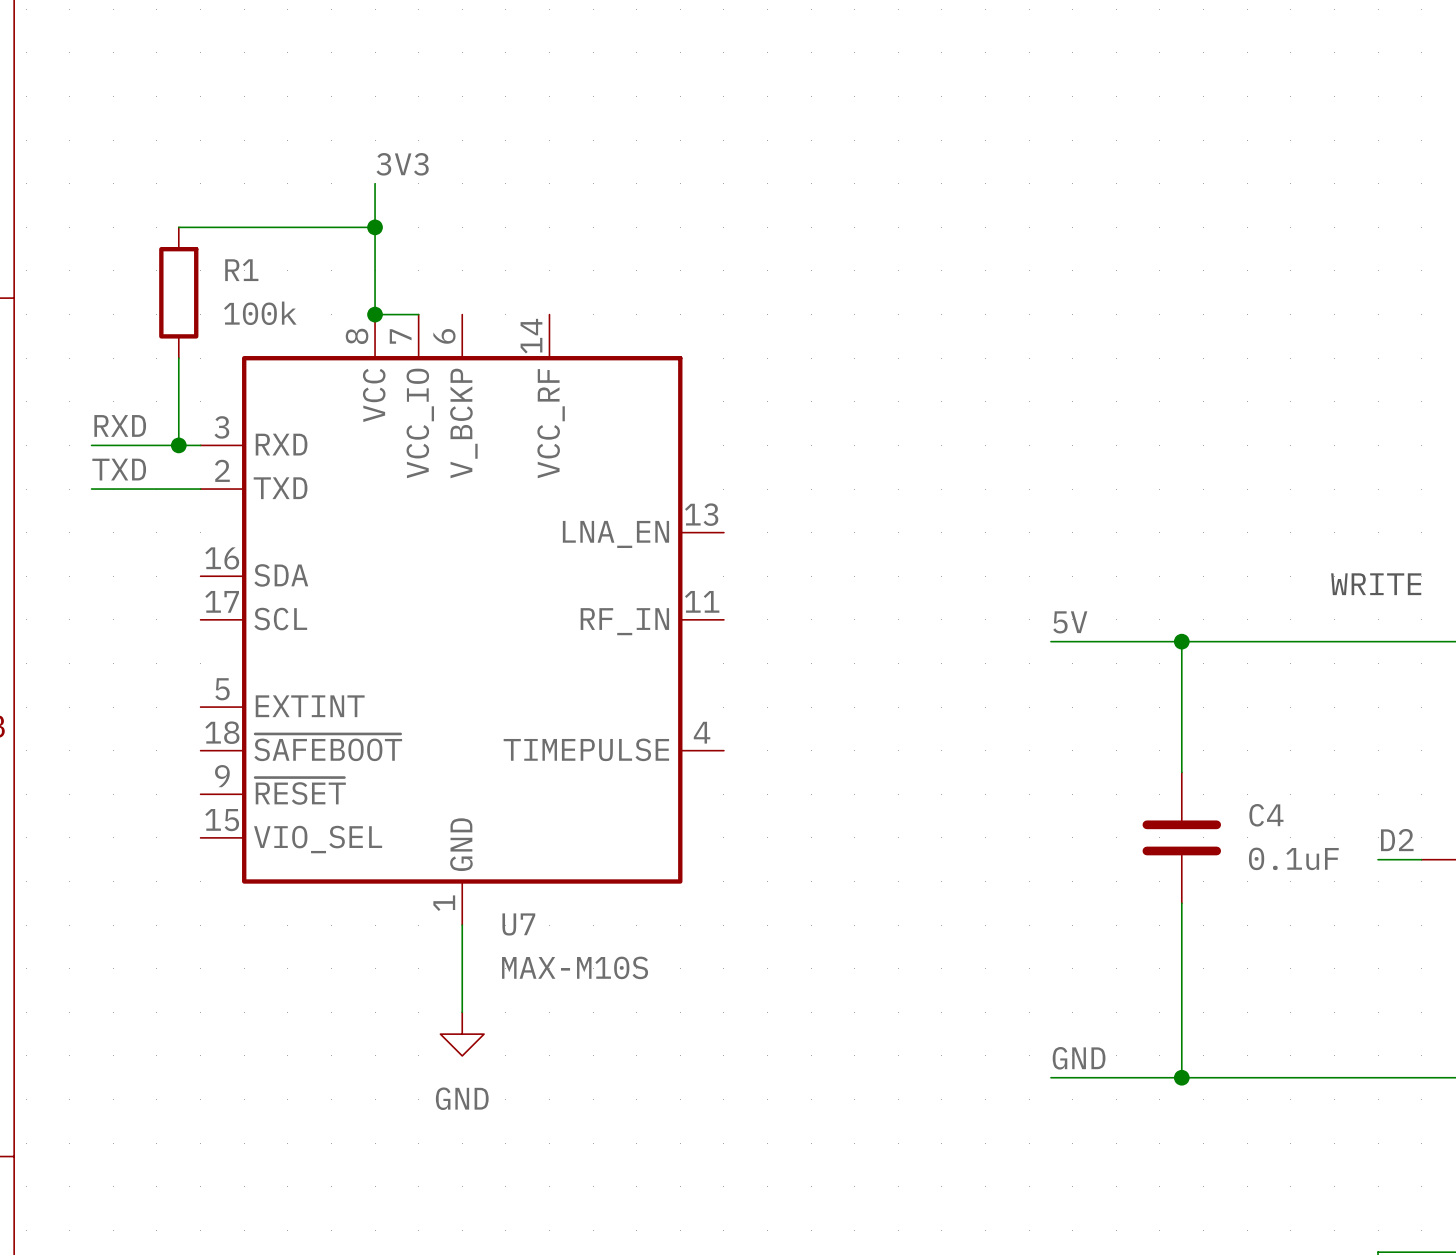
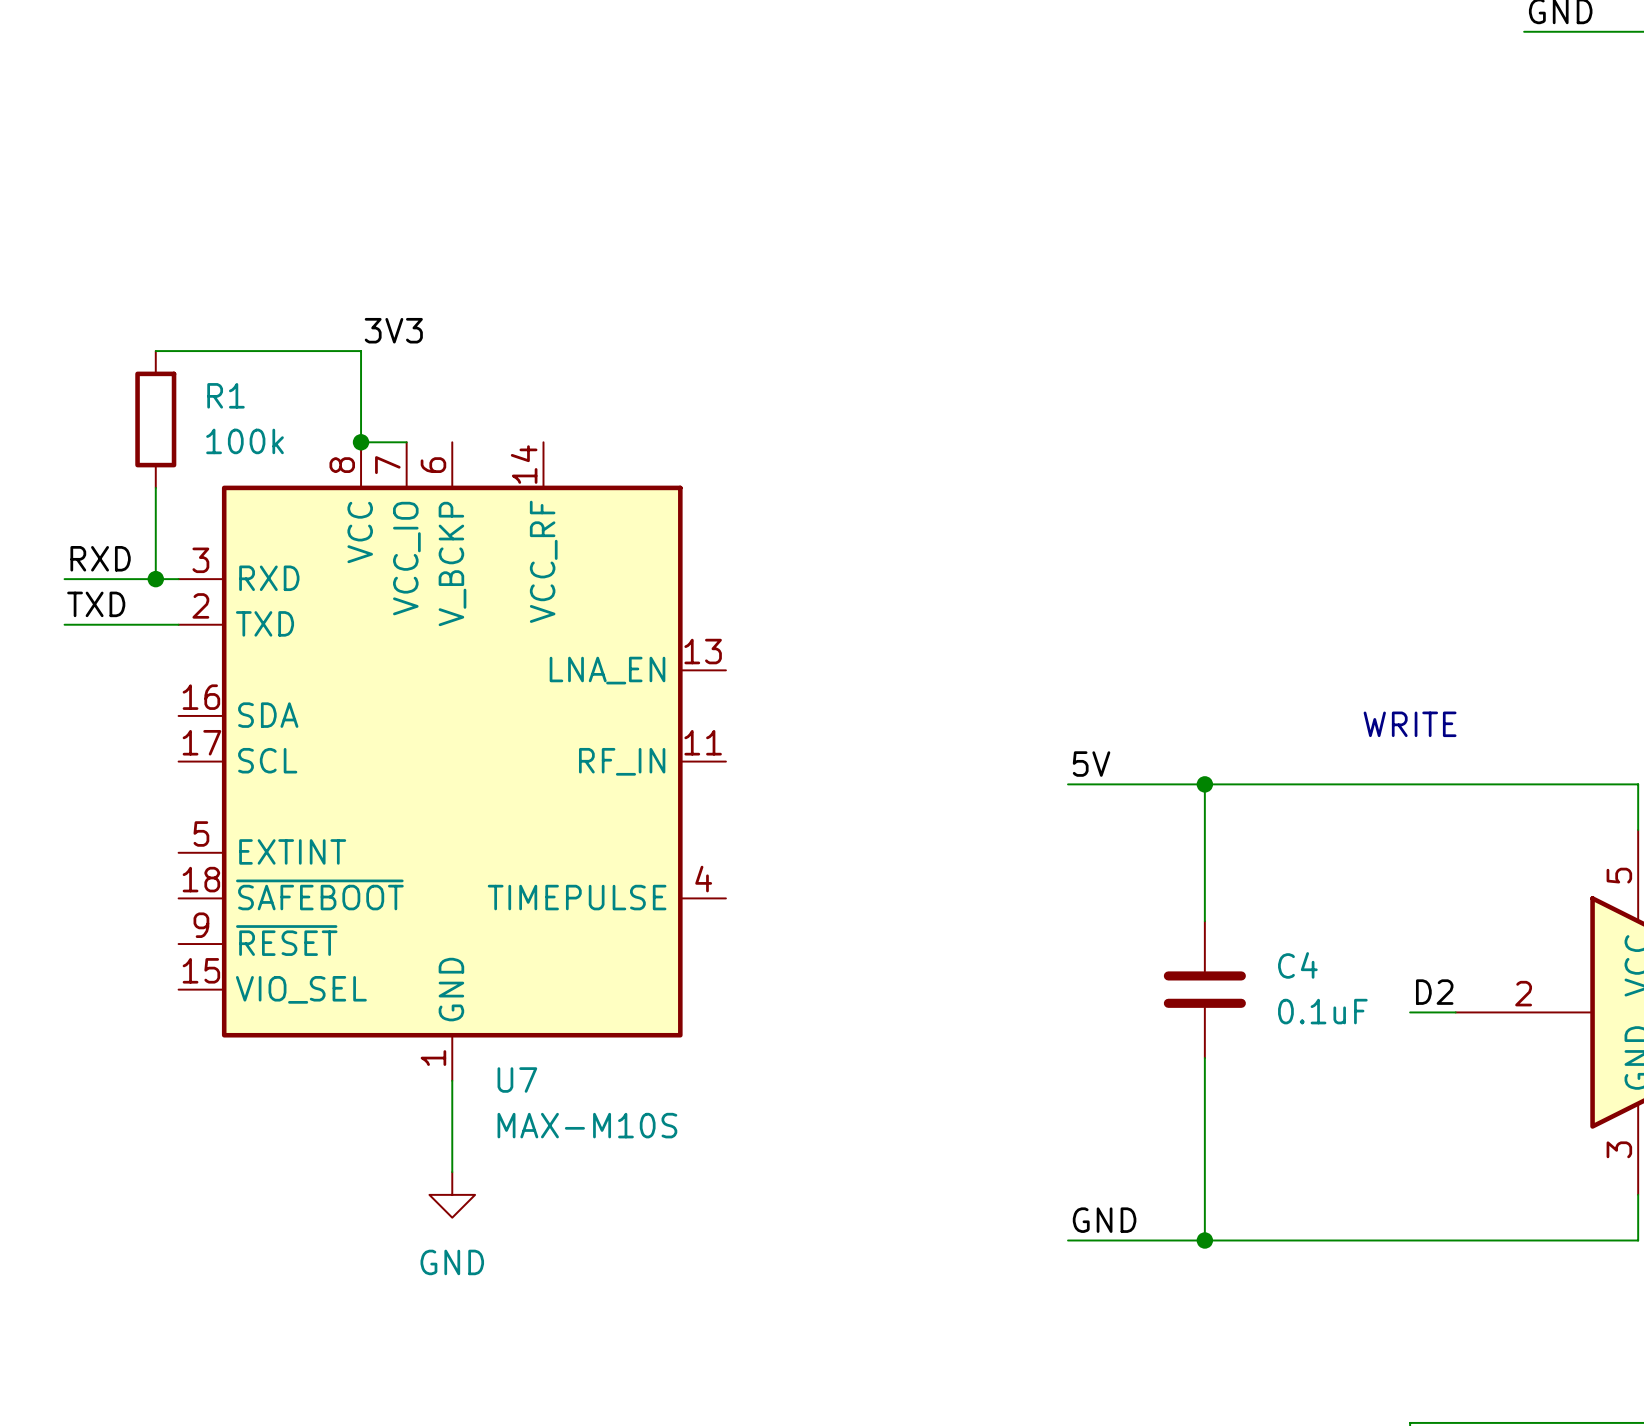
label position: 3V3 (402, 164) -> 3V3 (393, 330)
wire: (375, 183) (375, 227) -> none
junction: (375, 227) -> none

